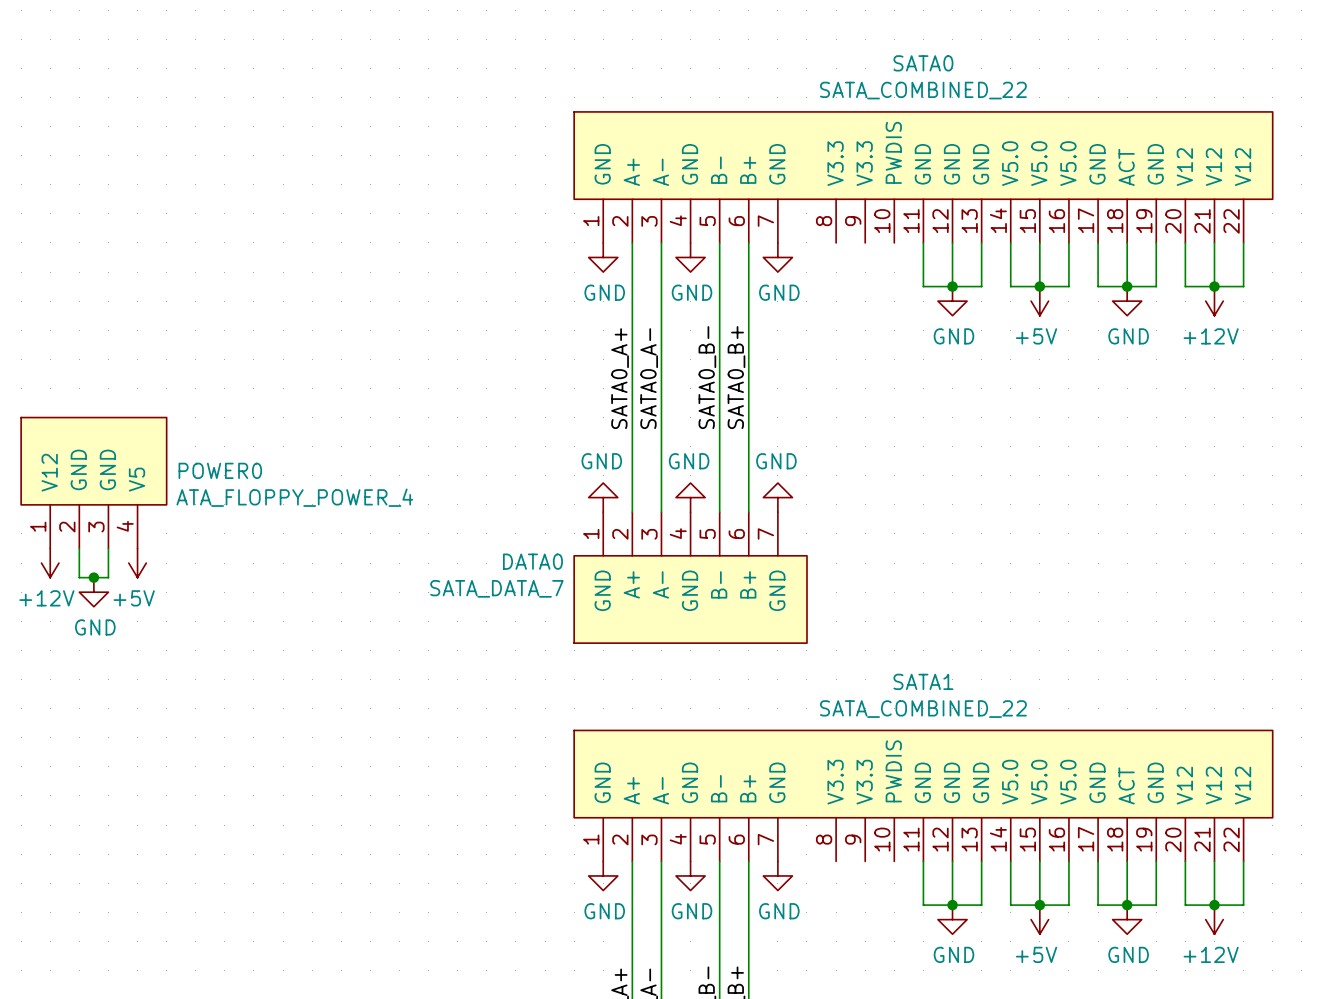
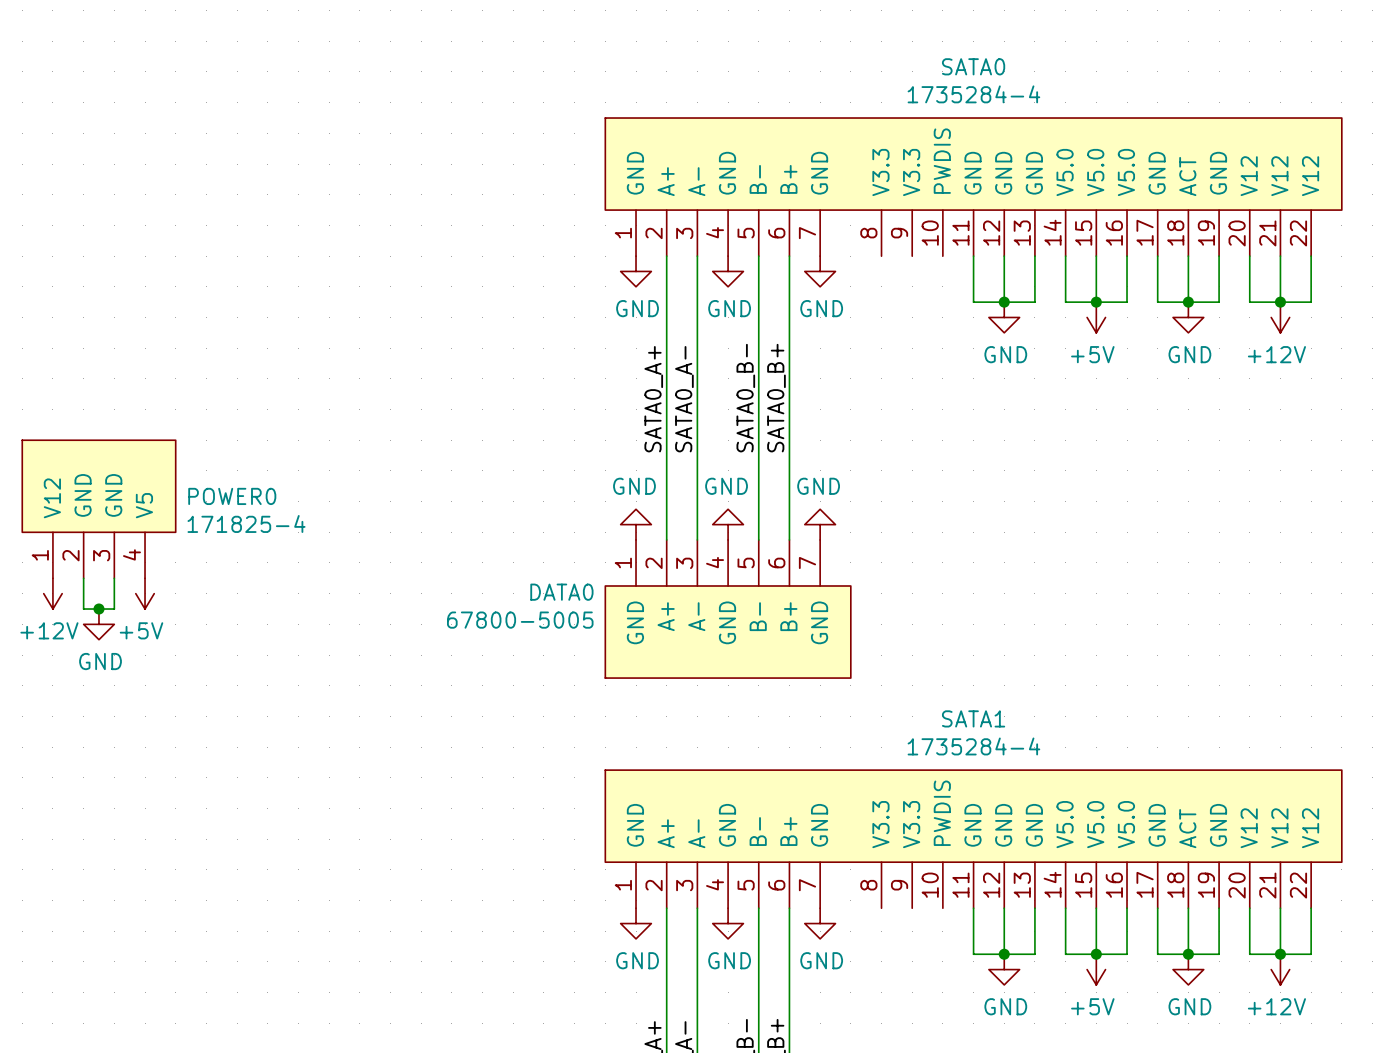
SATA0 value: SATA_COMBINED_22 (923, 90) -> 1735284-4 (973, 94)
POWER0 value: ATA_FLOPPY_POWER_4 (294, 497) -> 171825-4 (246, 523)
DATA0 value: SATA_DATA_7 (496, 588) -> 67800-5005 (520, 620)
SATA1 value: SATA_COMBINED_22 (923, 709) -> 1735284-4 (973, 746)

